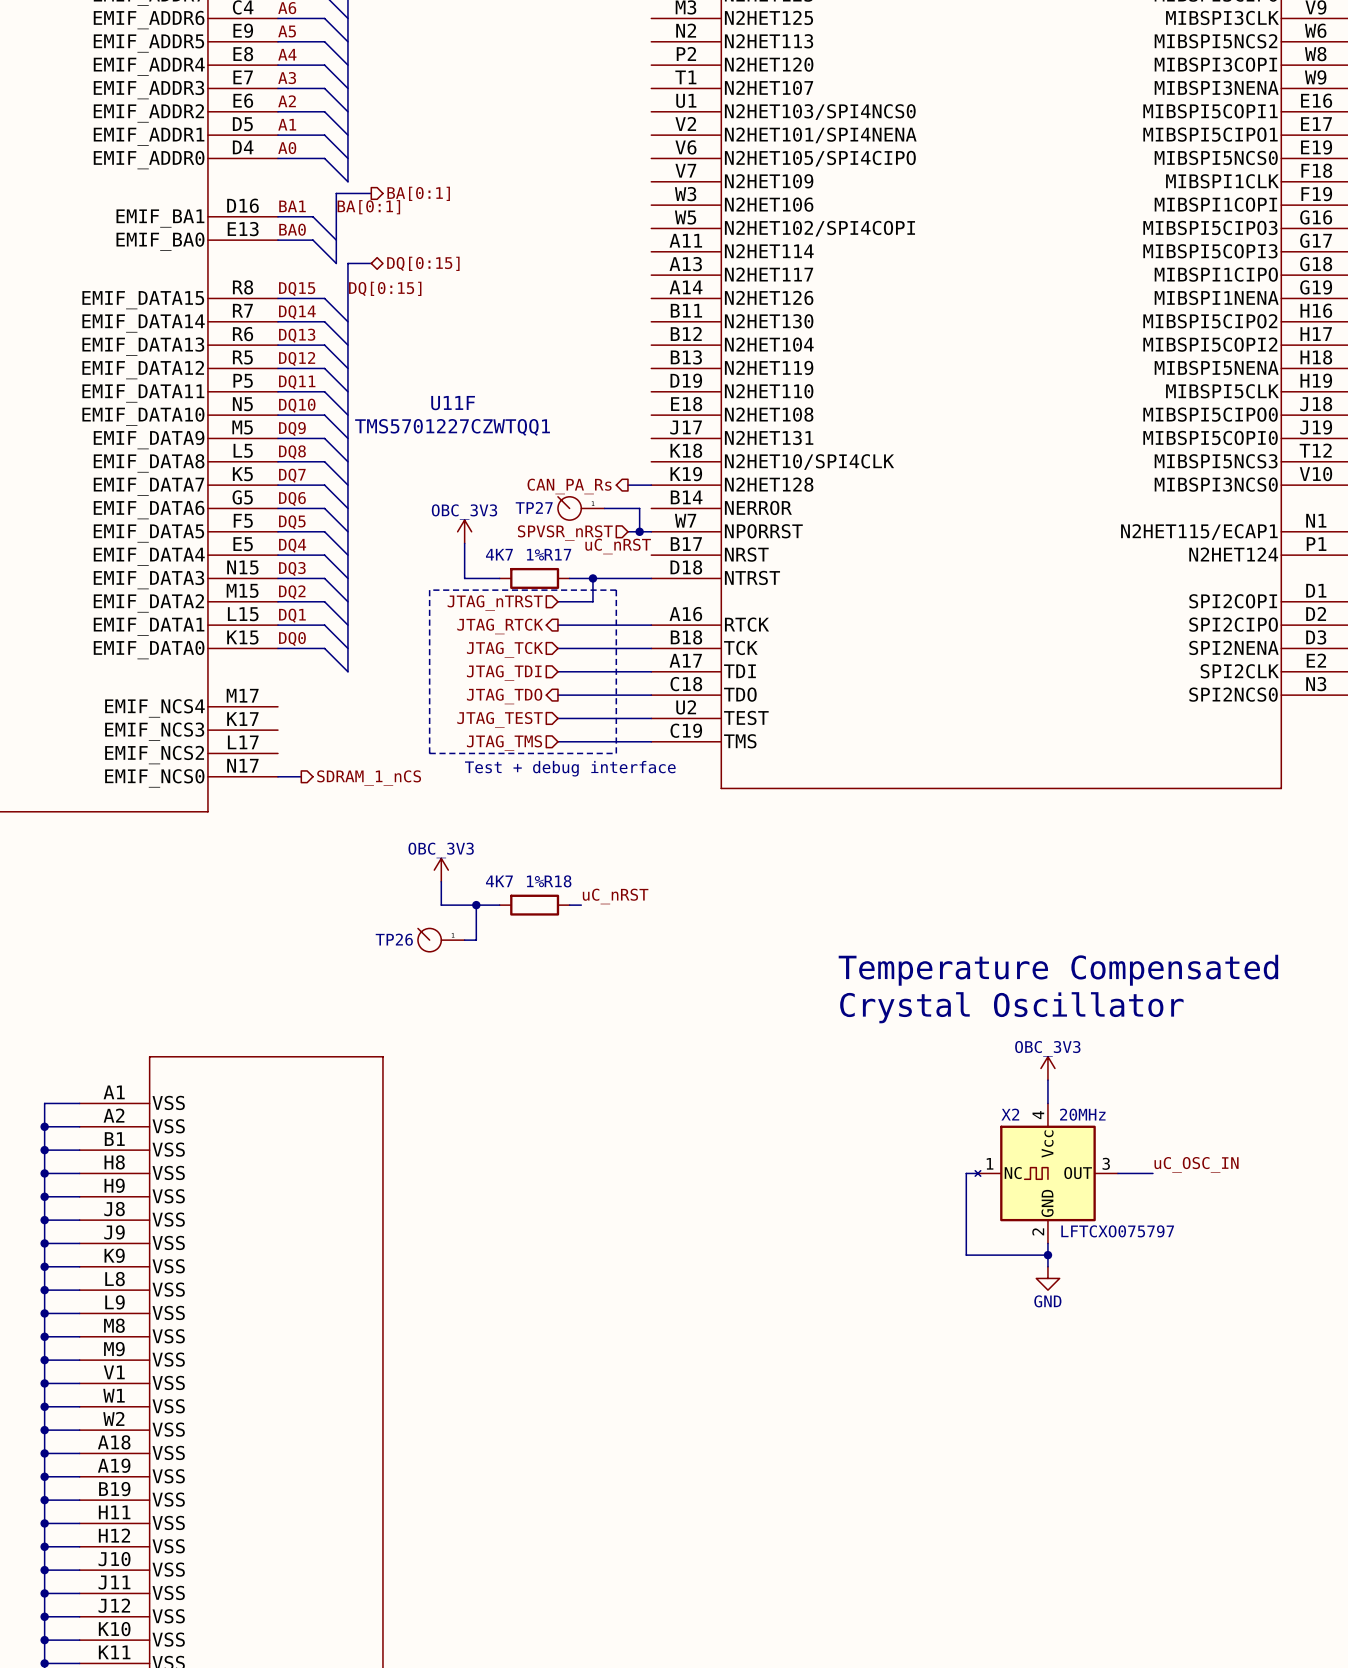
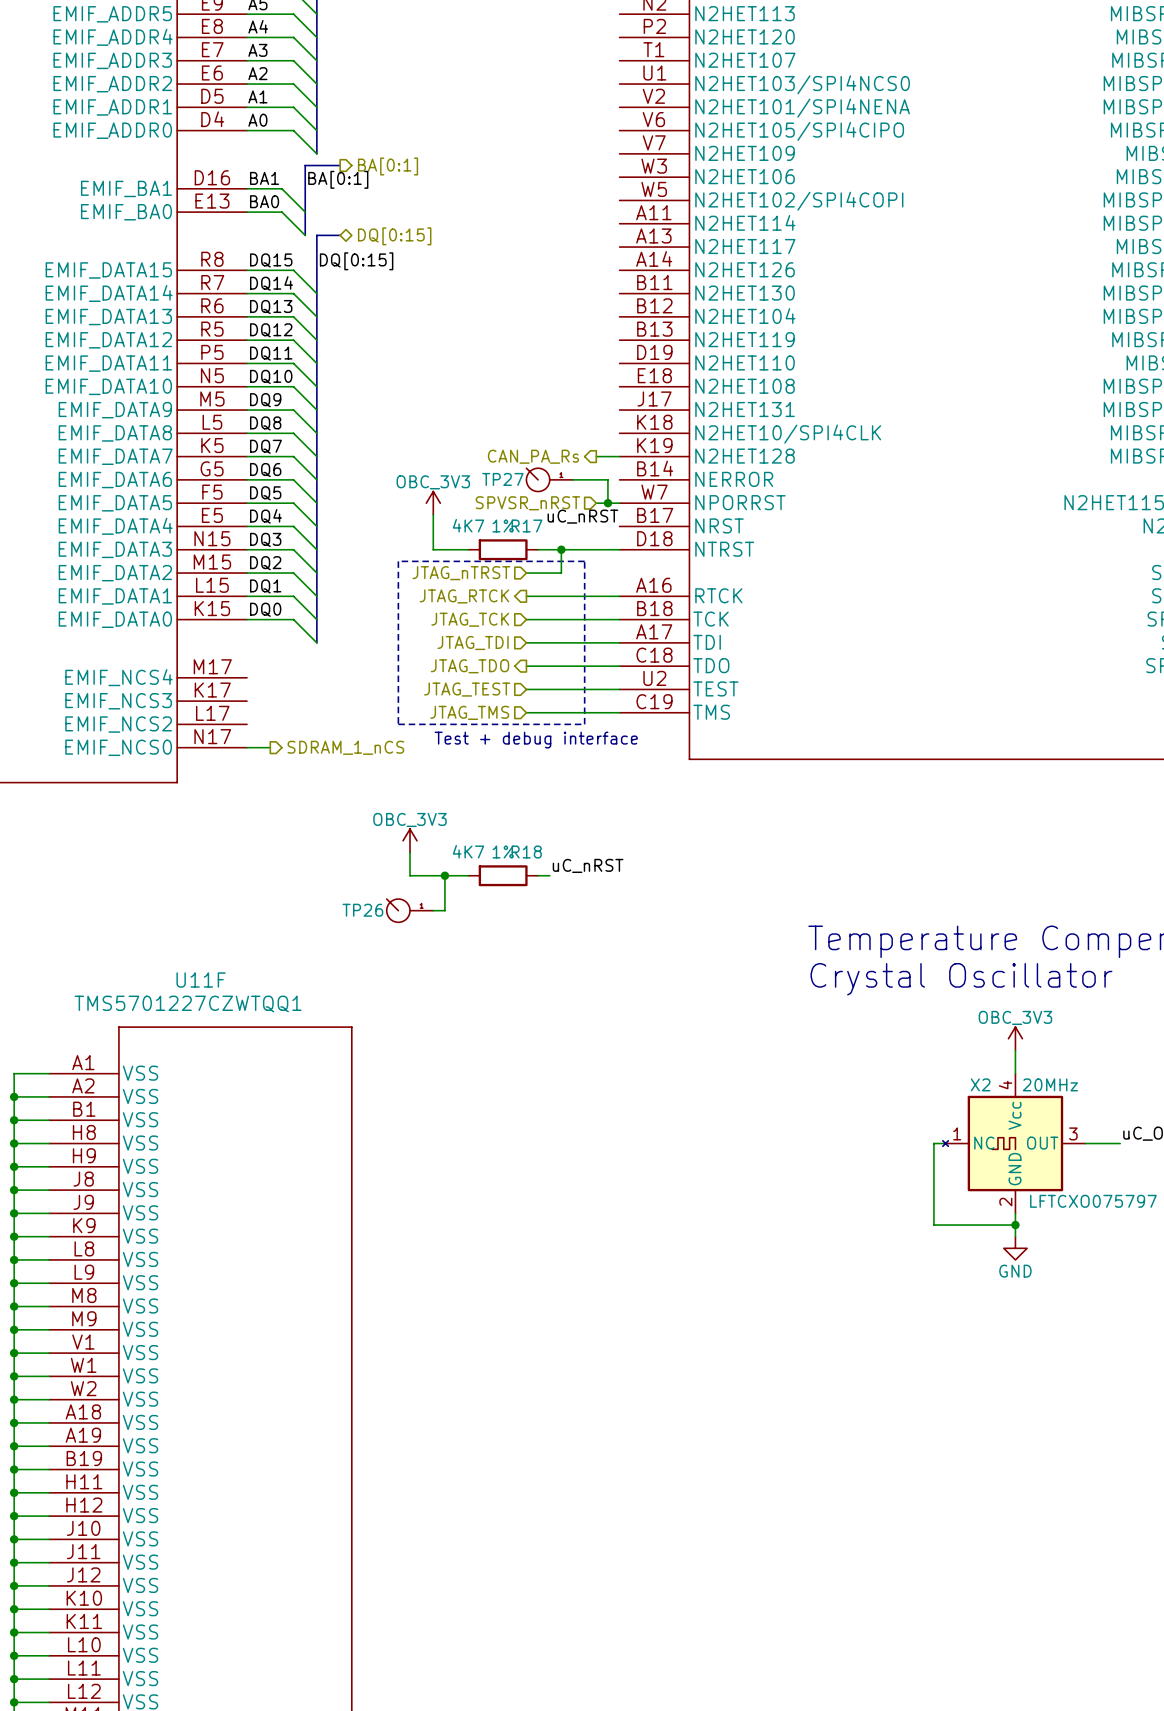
U11F name position: U11F (453, 403) -> U11F (201, 980)
U11F value position: TMS5701227CZWTQQ1 (452, 427) -> TMS5701227CZWTQQ1 (188, 1003)

